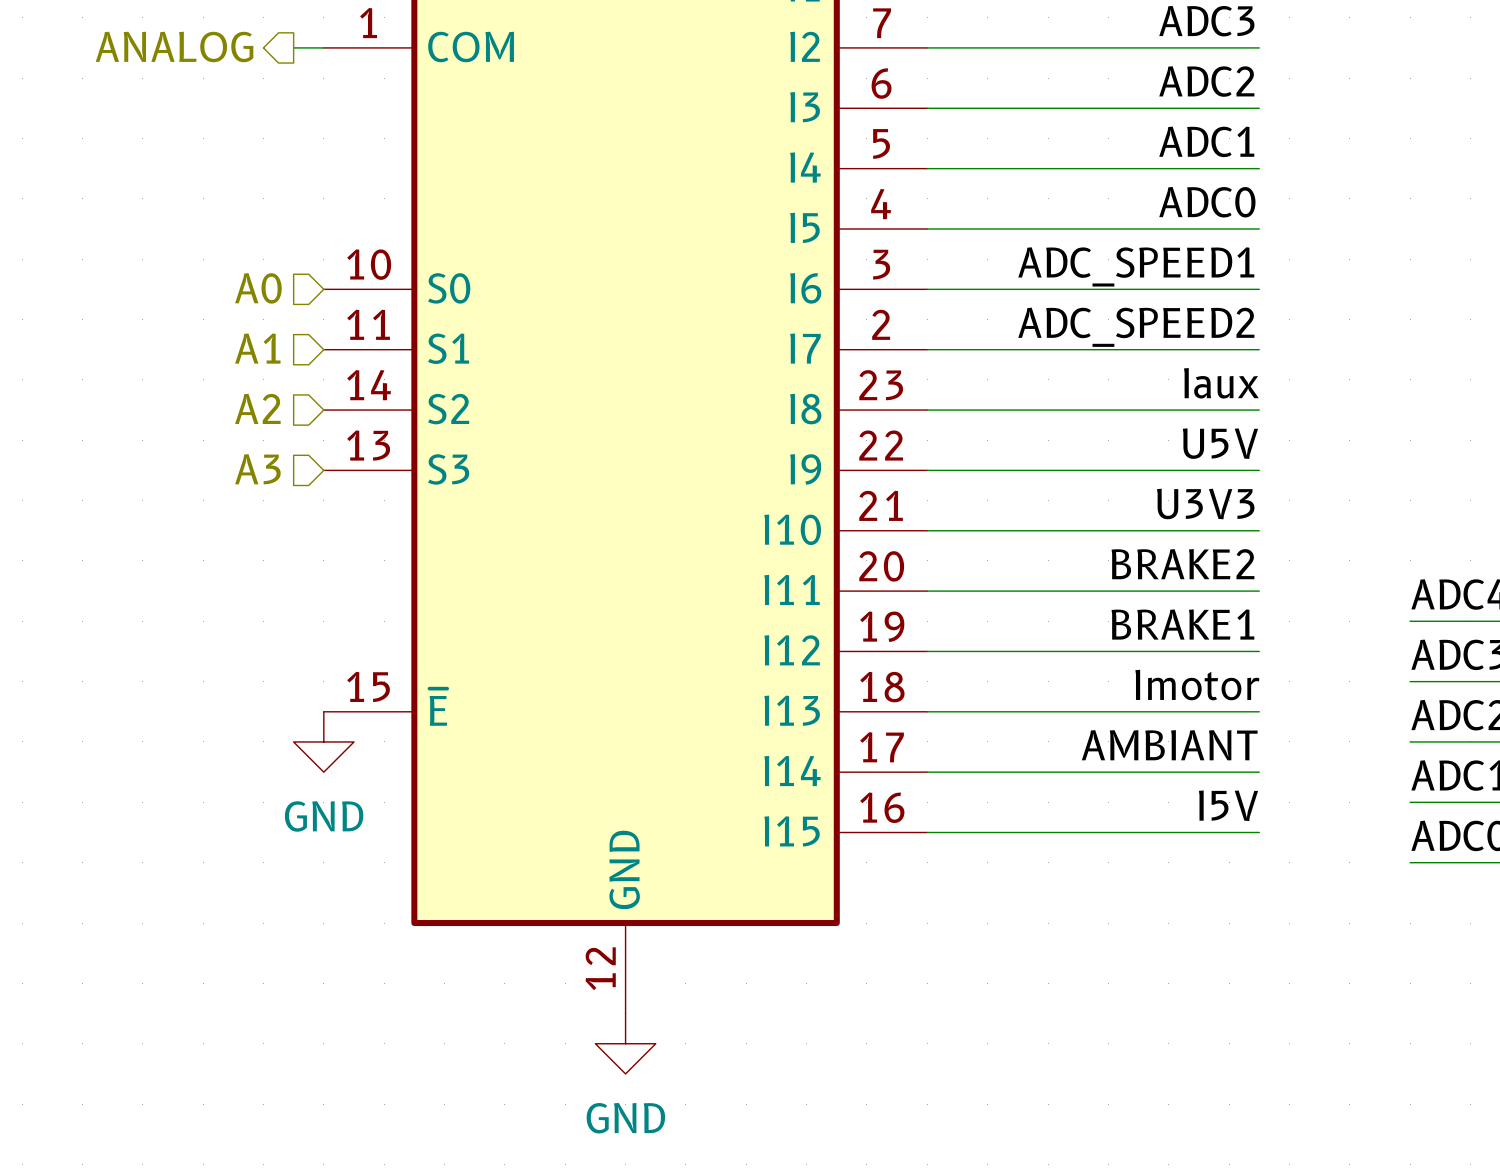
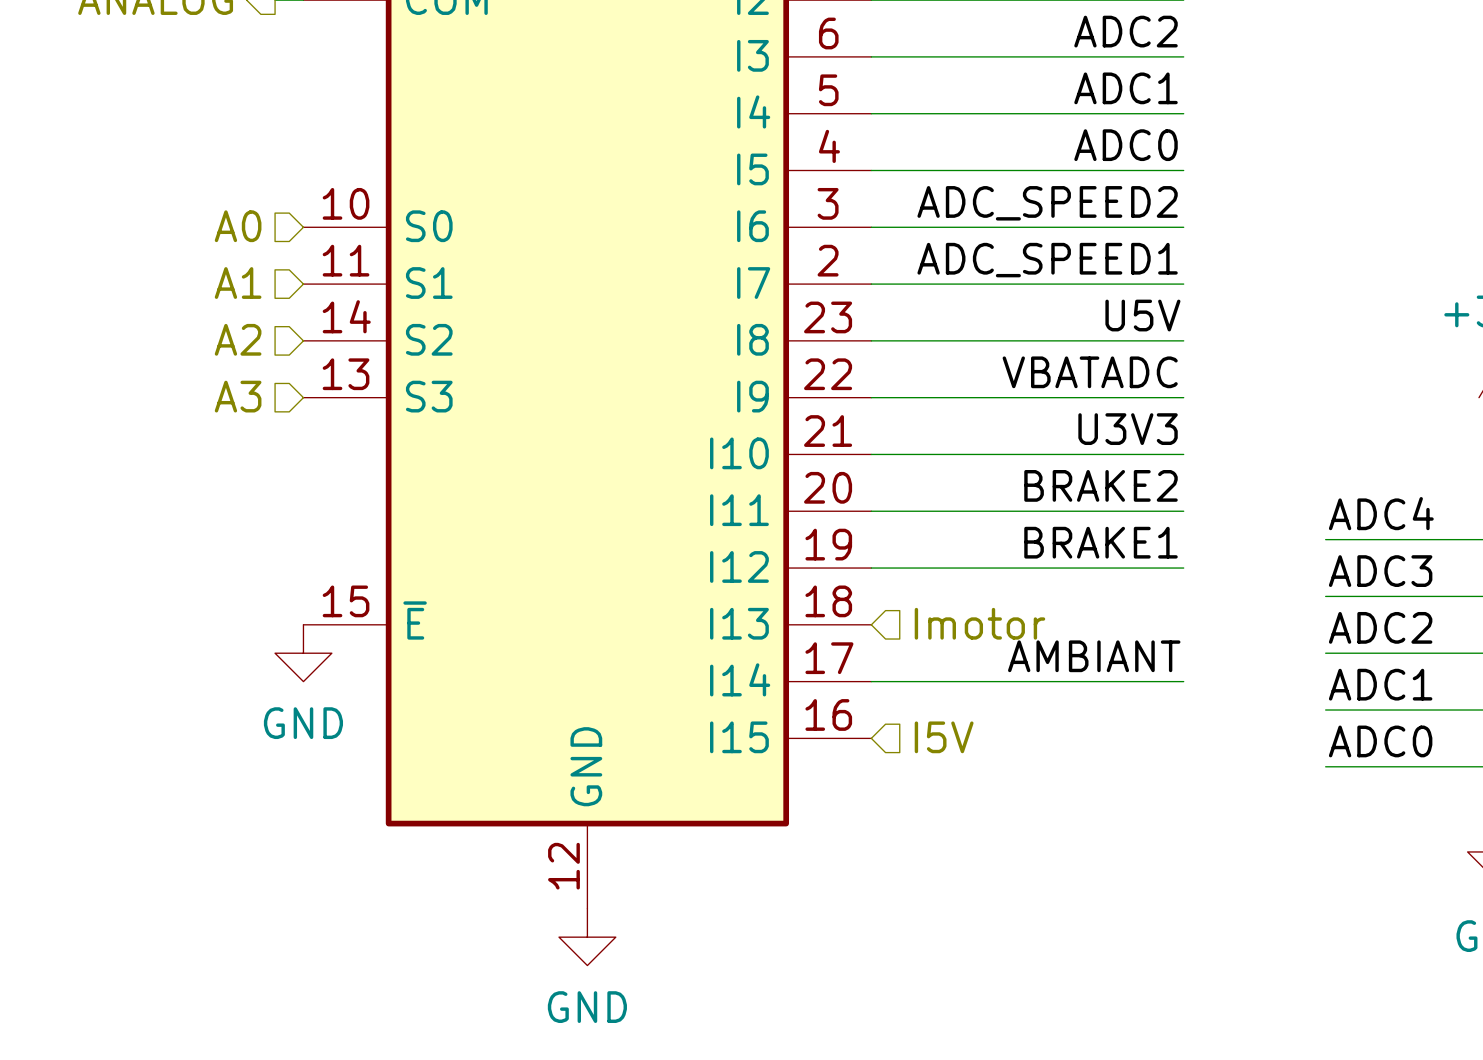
label: ADC_SPEED1 (1136, 266) -> ADC_SPEED2 (1047, 203)
label: ADC_SPEED2 (1136, 327) -> ADC_SPEED1 (1047, 260)
label: Iaux (1221, 383) -> U5V (1142, 315)
label: U5V (1220, 443) -> VBATADC (1090, 372)
label: Imotor (1197, 685) -> none
hierarchical label: none -> Imotor (979, 623)
wire: (927, 711) (1259, 711) -> none
label: I5V (1228, 805) -> none
hierarchical label: none -> I5V (944, 737)
wire: (927, 832) (1259, 832) -> none

